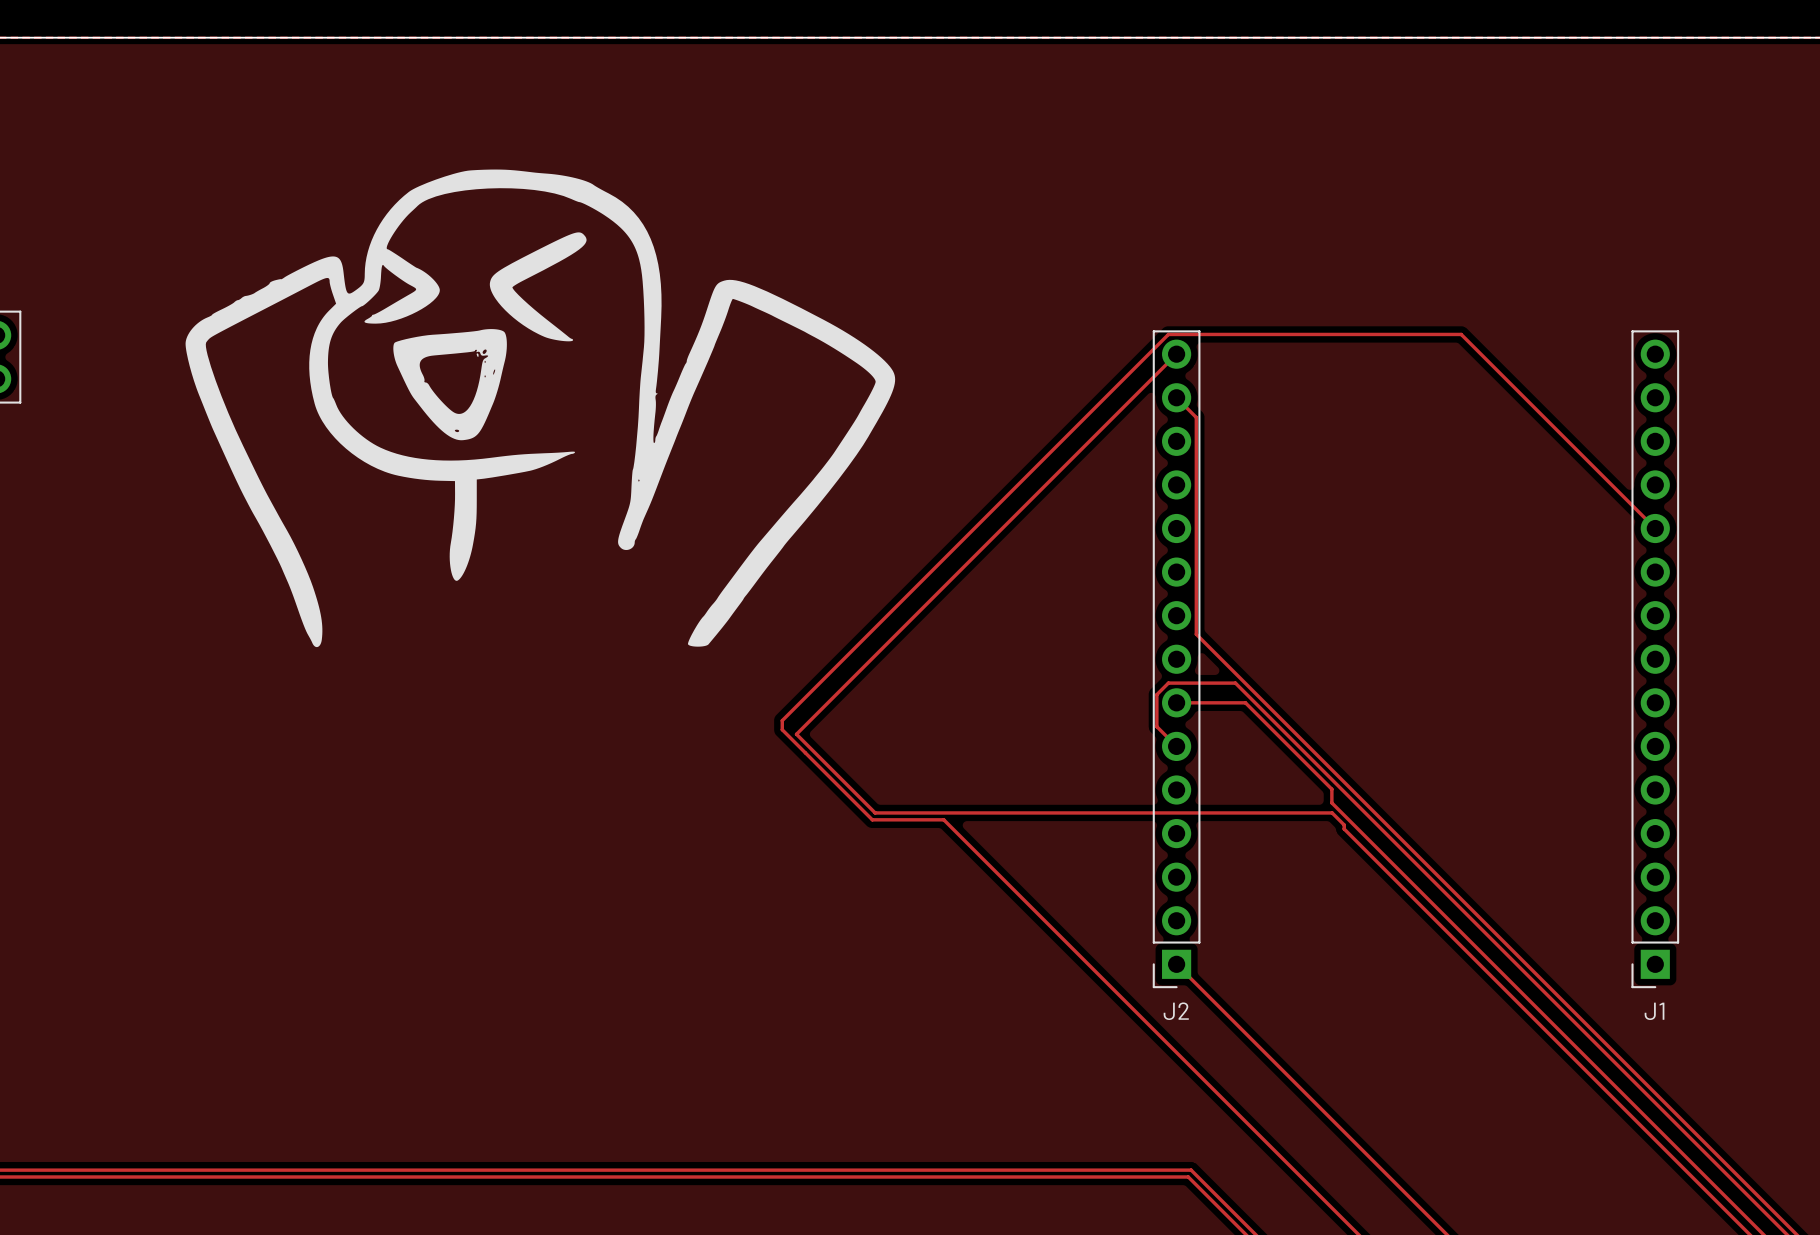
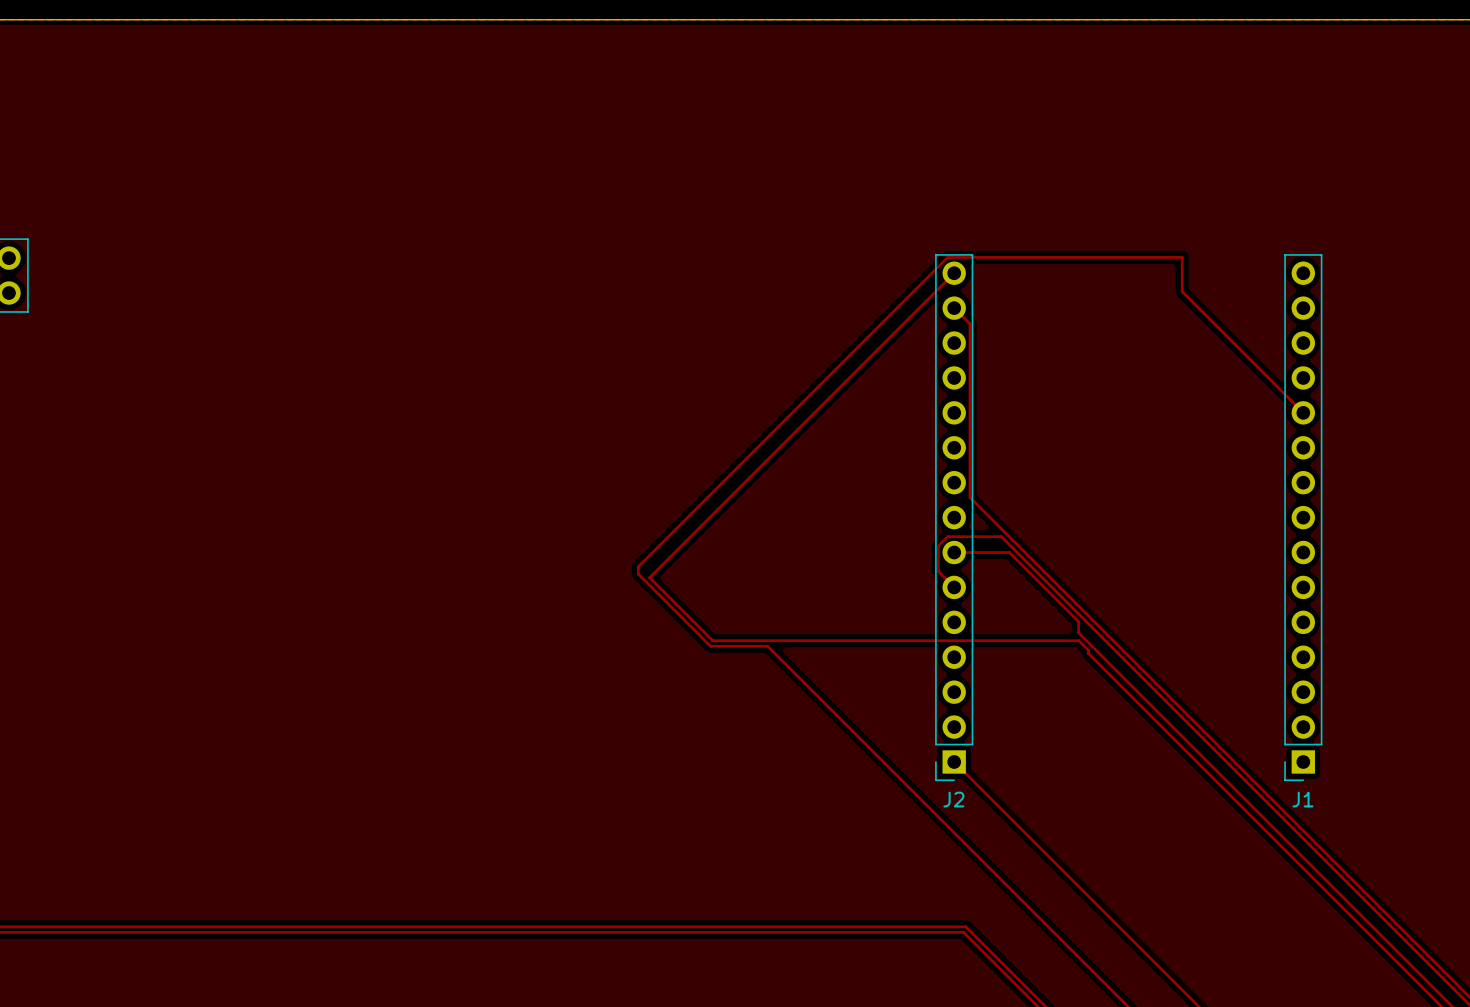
drawing: [185, 169, 896, 648] -> none
track: (1461, 334) (1655, 528) -> (1182, 257) (1182, 291) (1303, 412)
J1 position: (1655, 659) -> (1303, 517)

